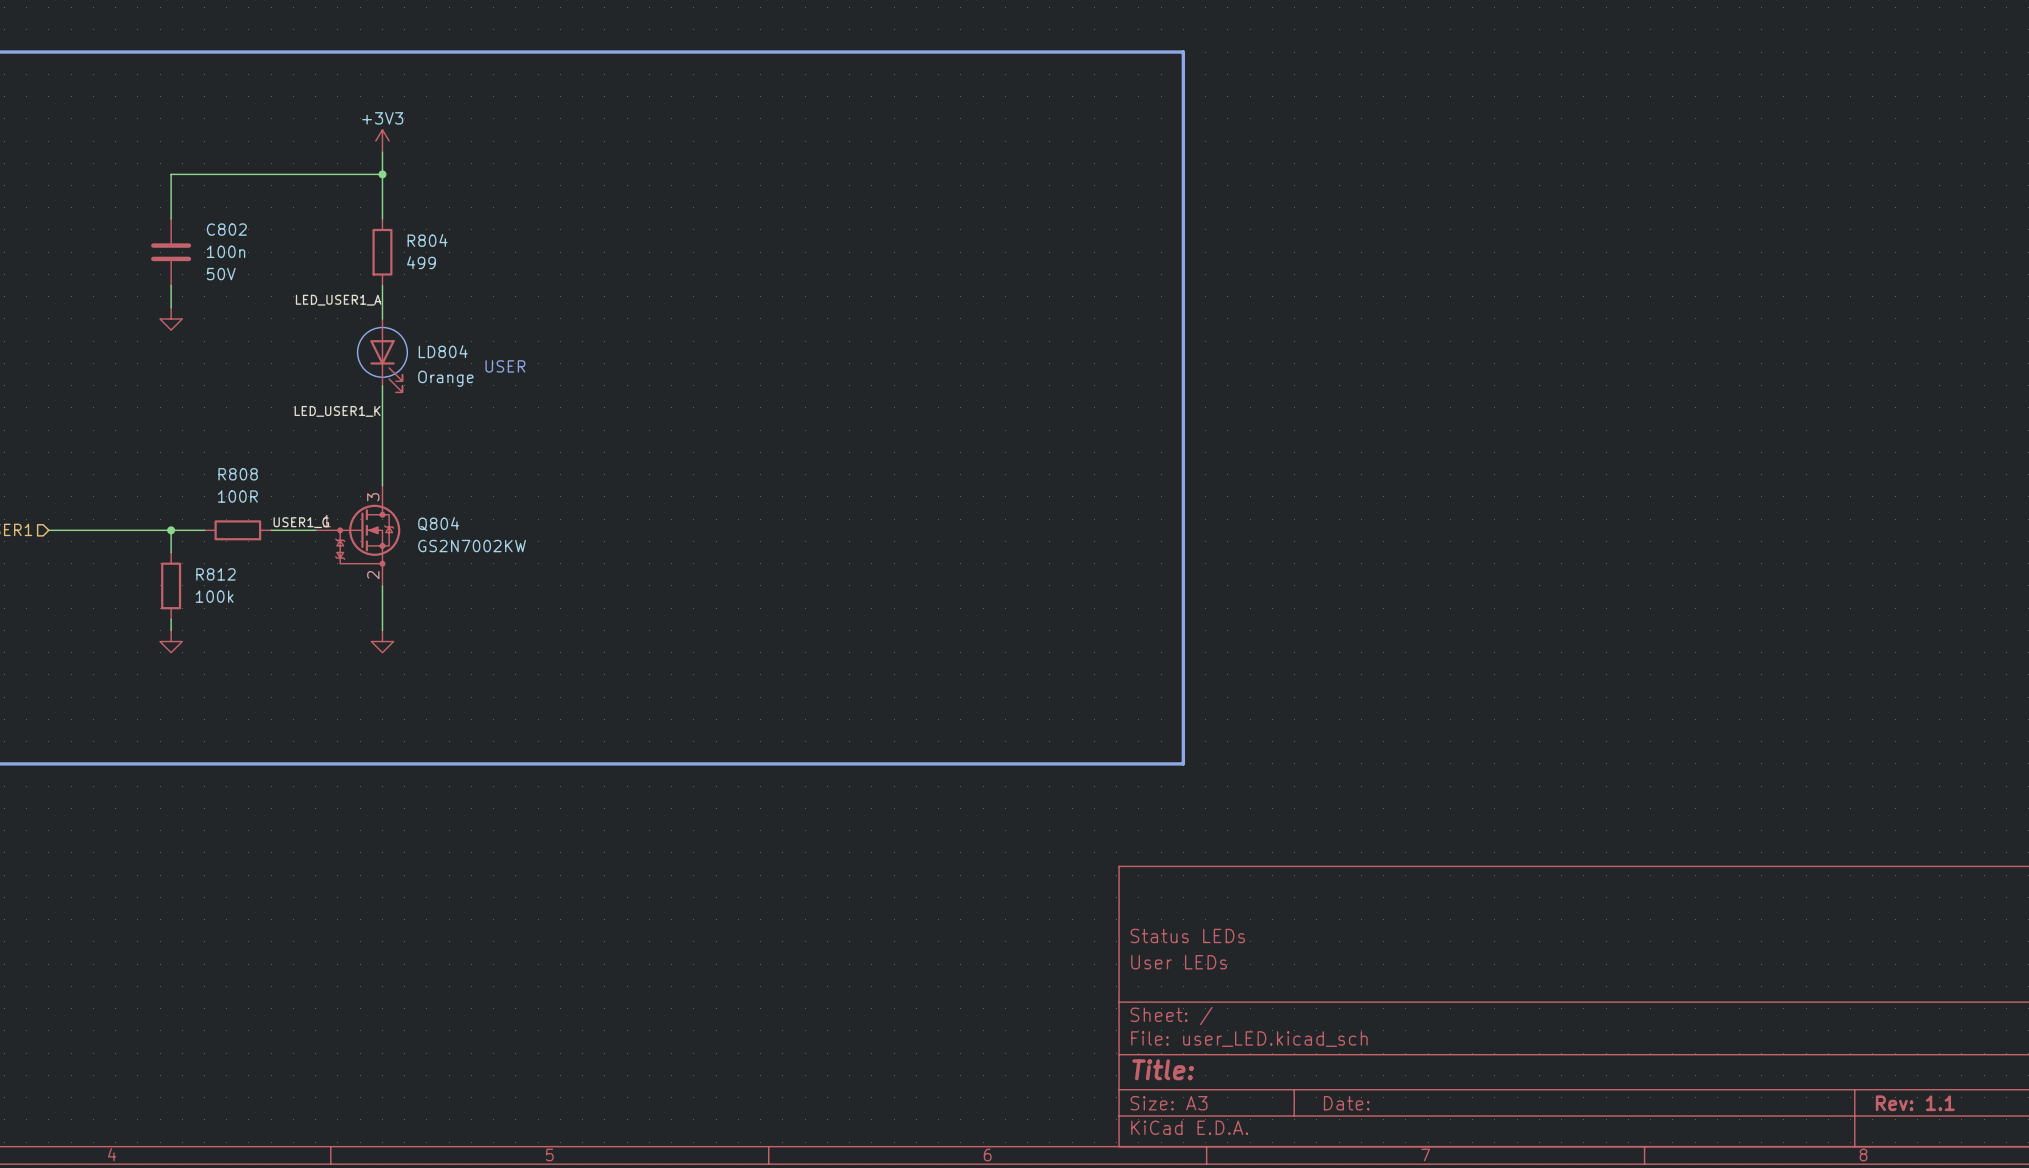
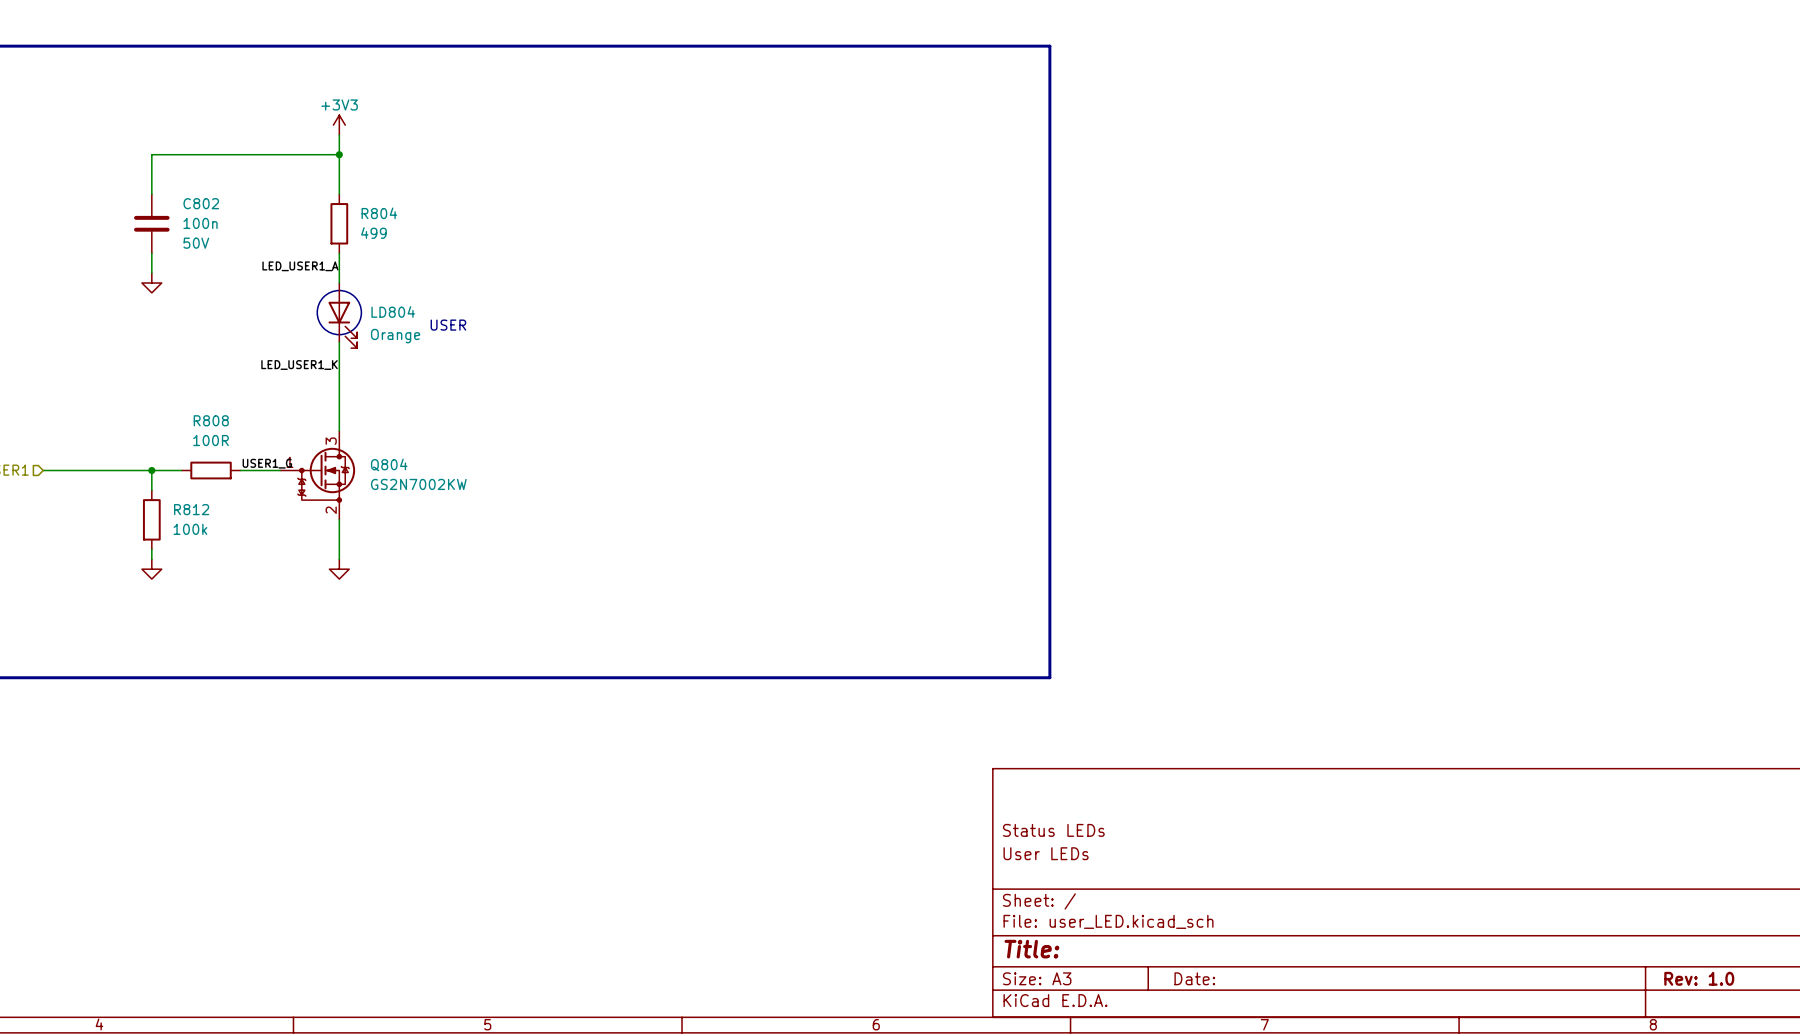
title block: Rev: 1.1 (1915, 1103) -> Rev: 1.0 (1699, 978)

